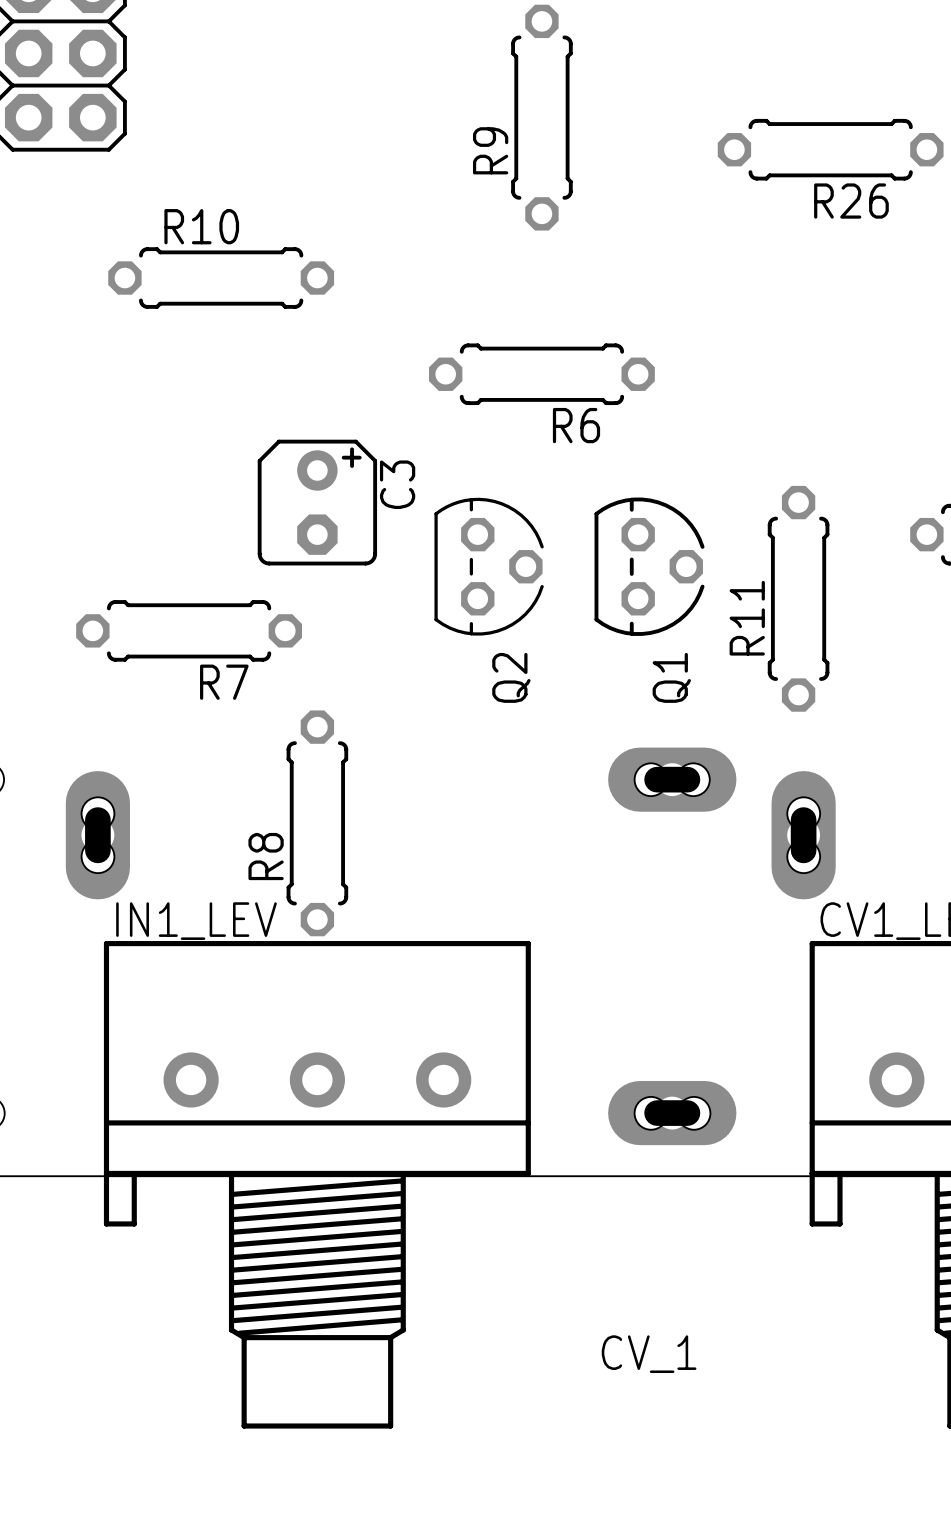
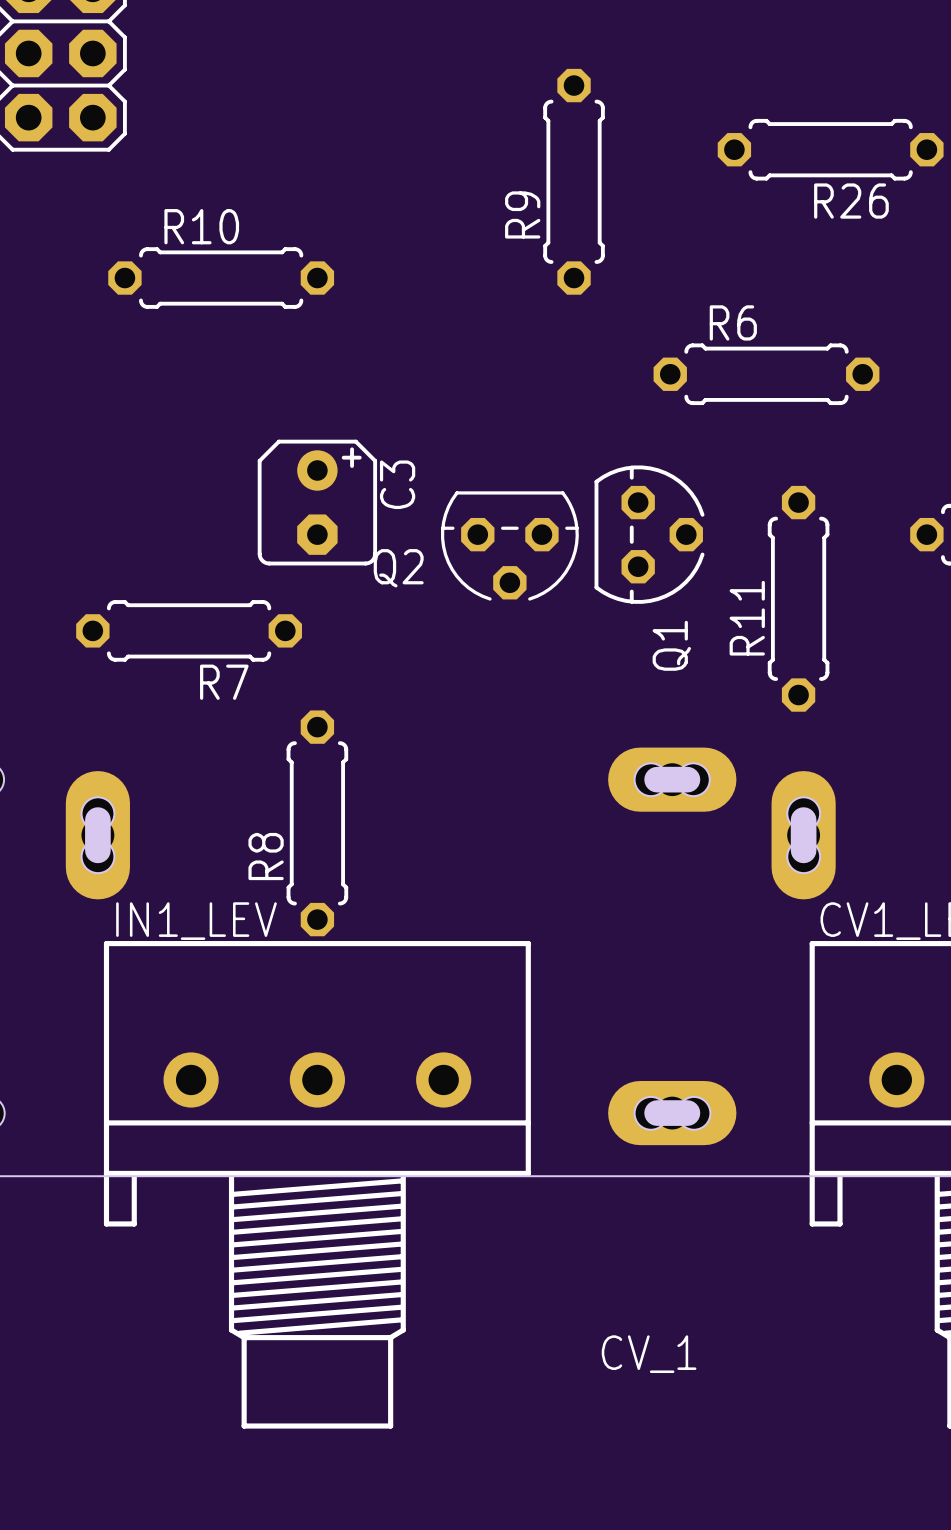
R9 position: (541, 117) -> (574, 181)
R6 position: (541, 374) -> (766, 374)
R6 name position: R6 (576, 425) -> R6 (733, 322)
Q2 rotation: 0° (489, 566) -> 90° clockwise (509, 545)
Q1 position: (649, 566) -> (649, 534)

